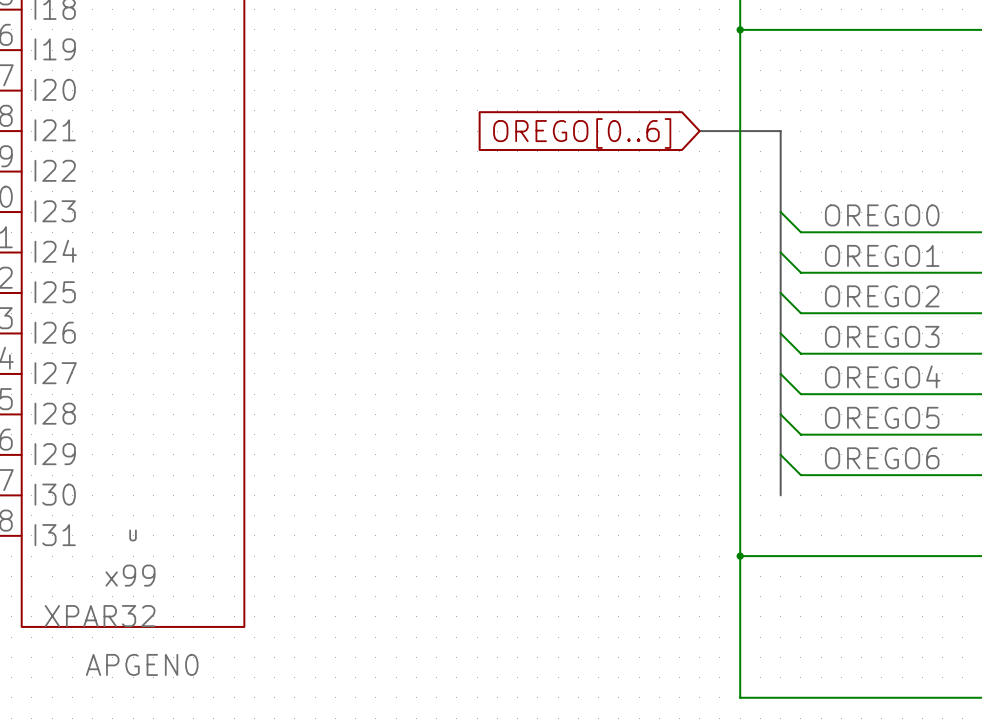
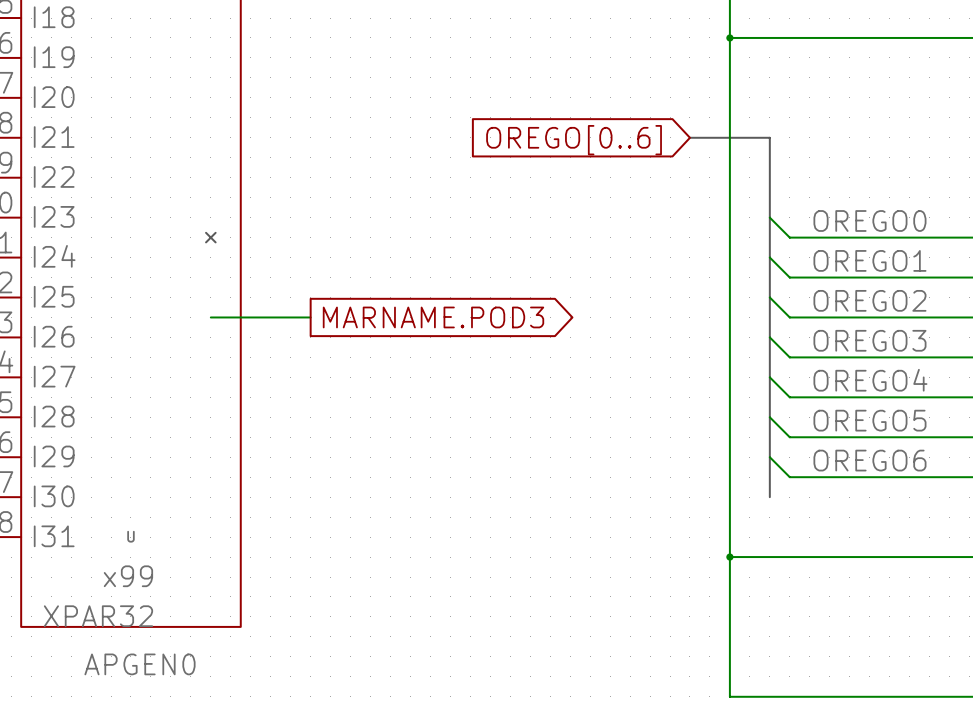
no-connect mark: none -> (210, 237)
wire: none -> (210, 317) (310, 317)
global label: none -> MARNAME.POD3 (433, 317)

